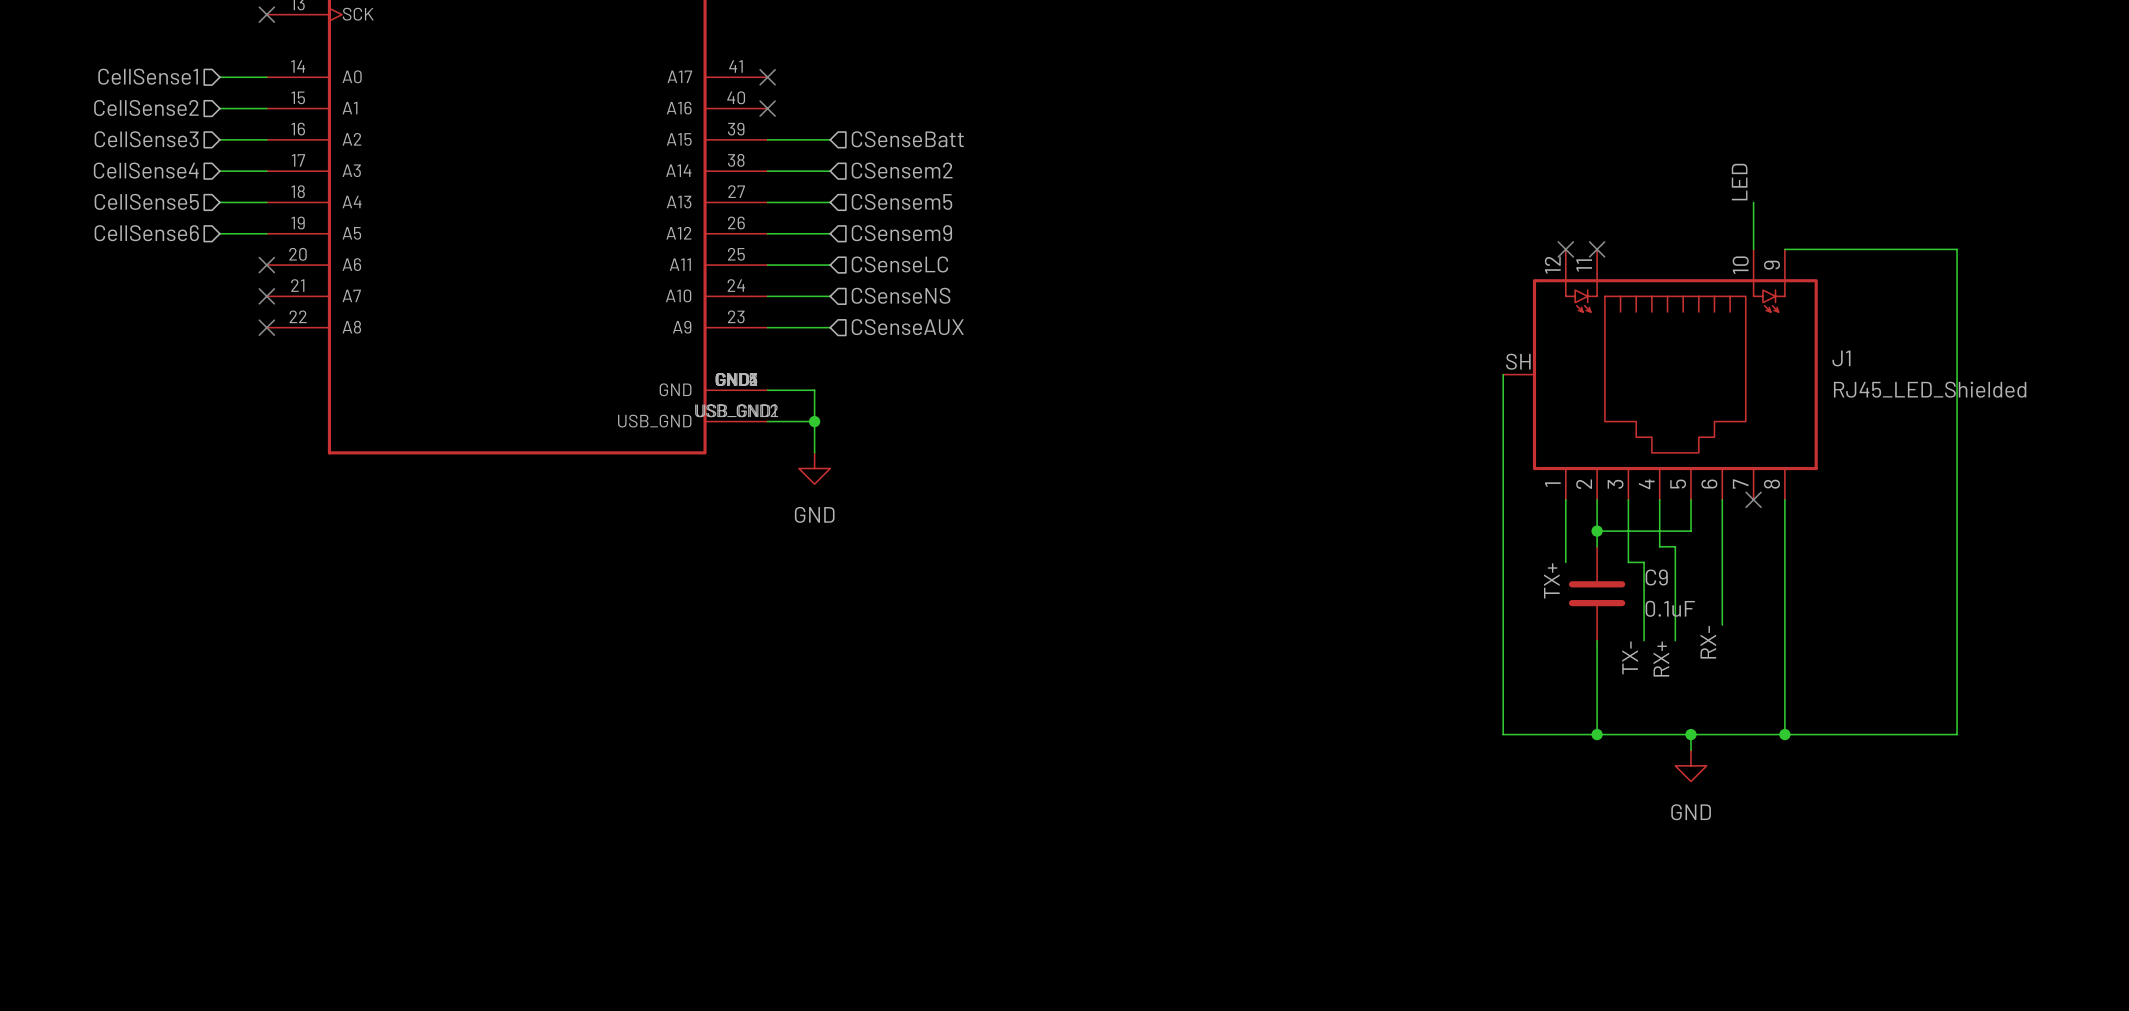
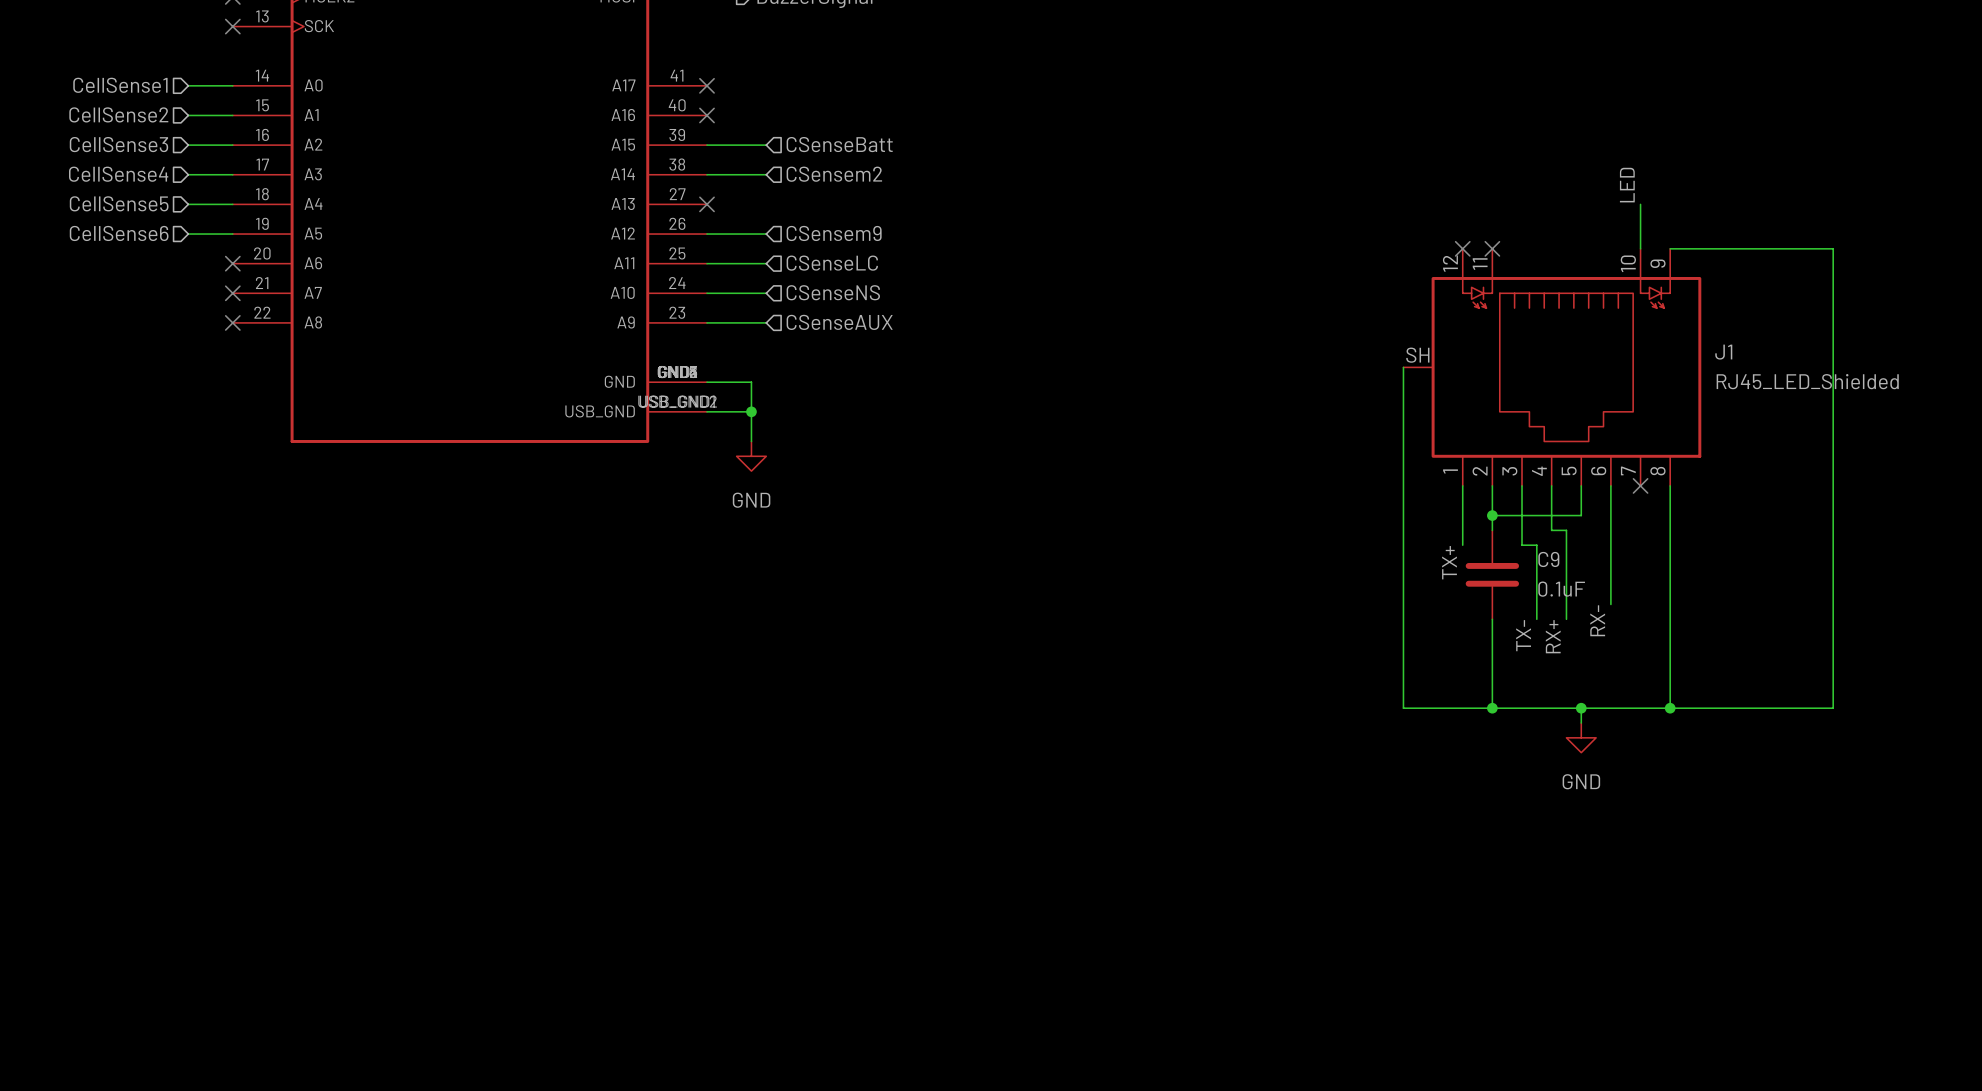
hierarchical label: CSensem5 (901, 201) -> none
wire: (767, 202) (830, 202) -> none
no-connect mark: none -> (707, 204)

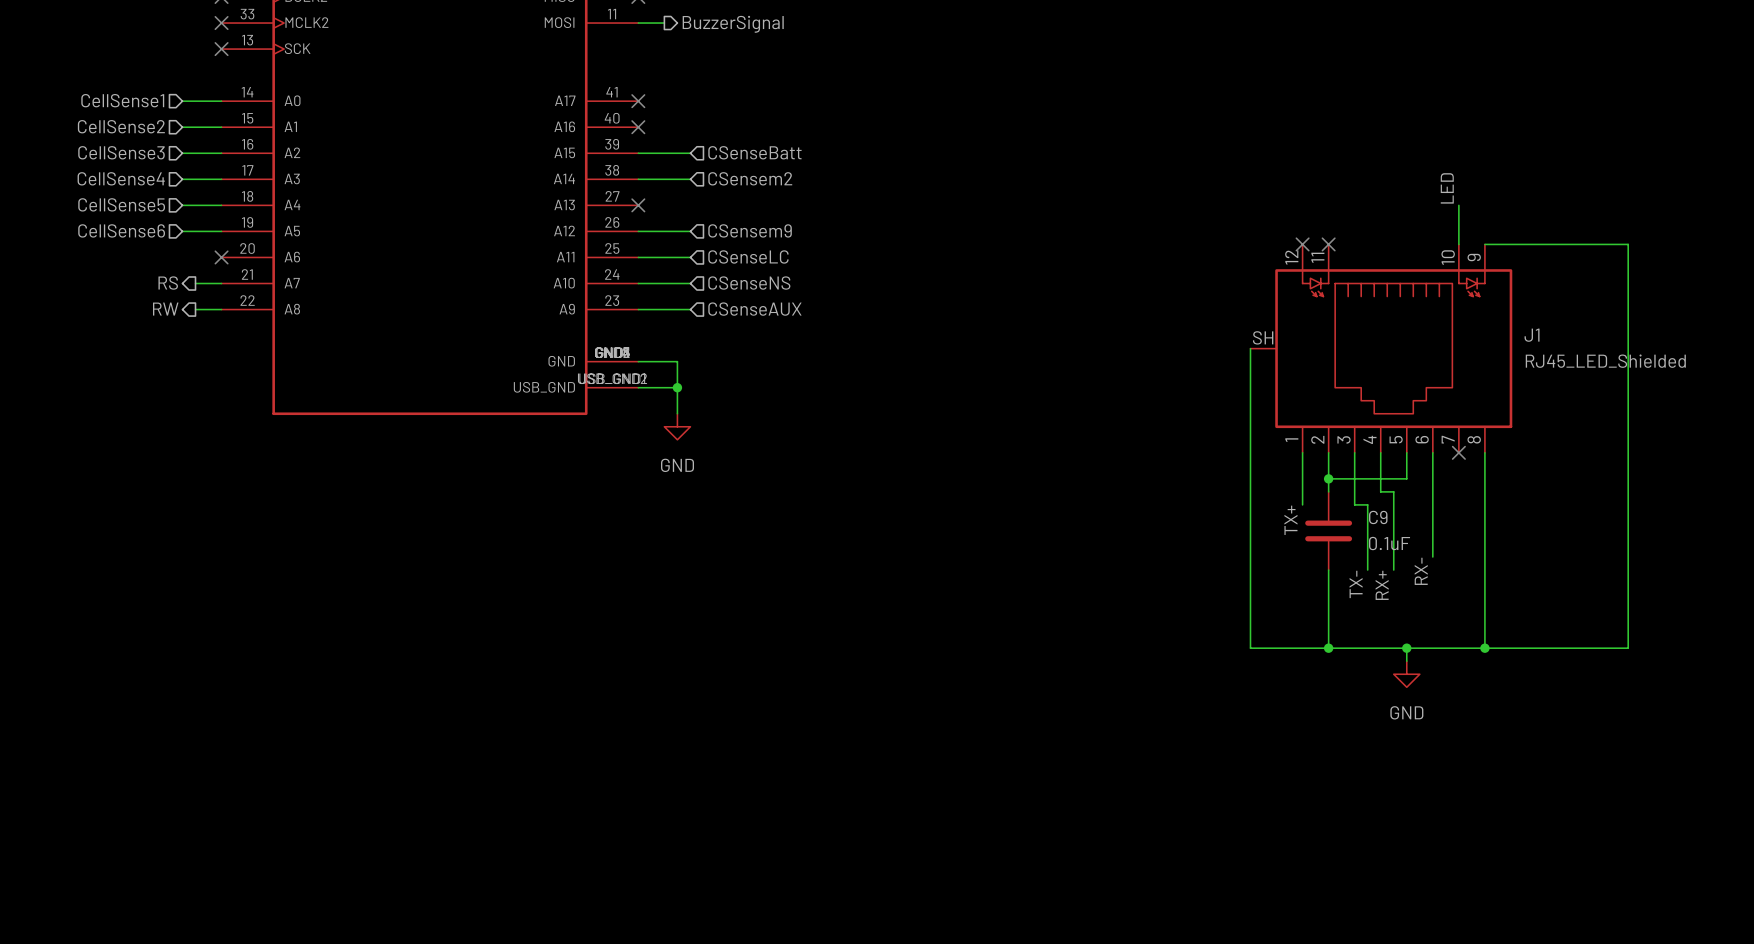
hierarchical label: none -> RS (168, 283)
wire: none -> (195, 283) (221, 283)
no-connect mark: (232, 293) -> none
hierarchical label: none -> RW (165, 309)
wire: none -> (195, 309) (221, 309)
no-connect mark: (232, 322) -> none

